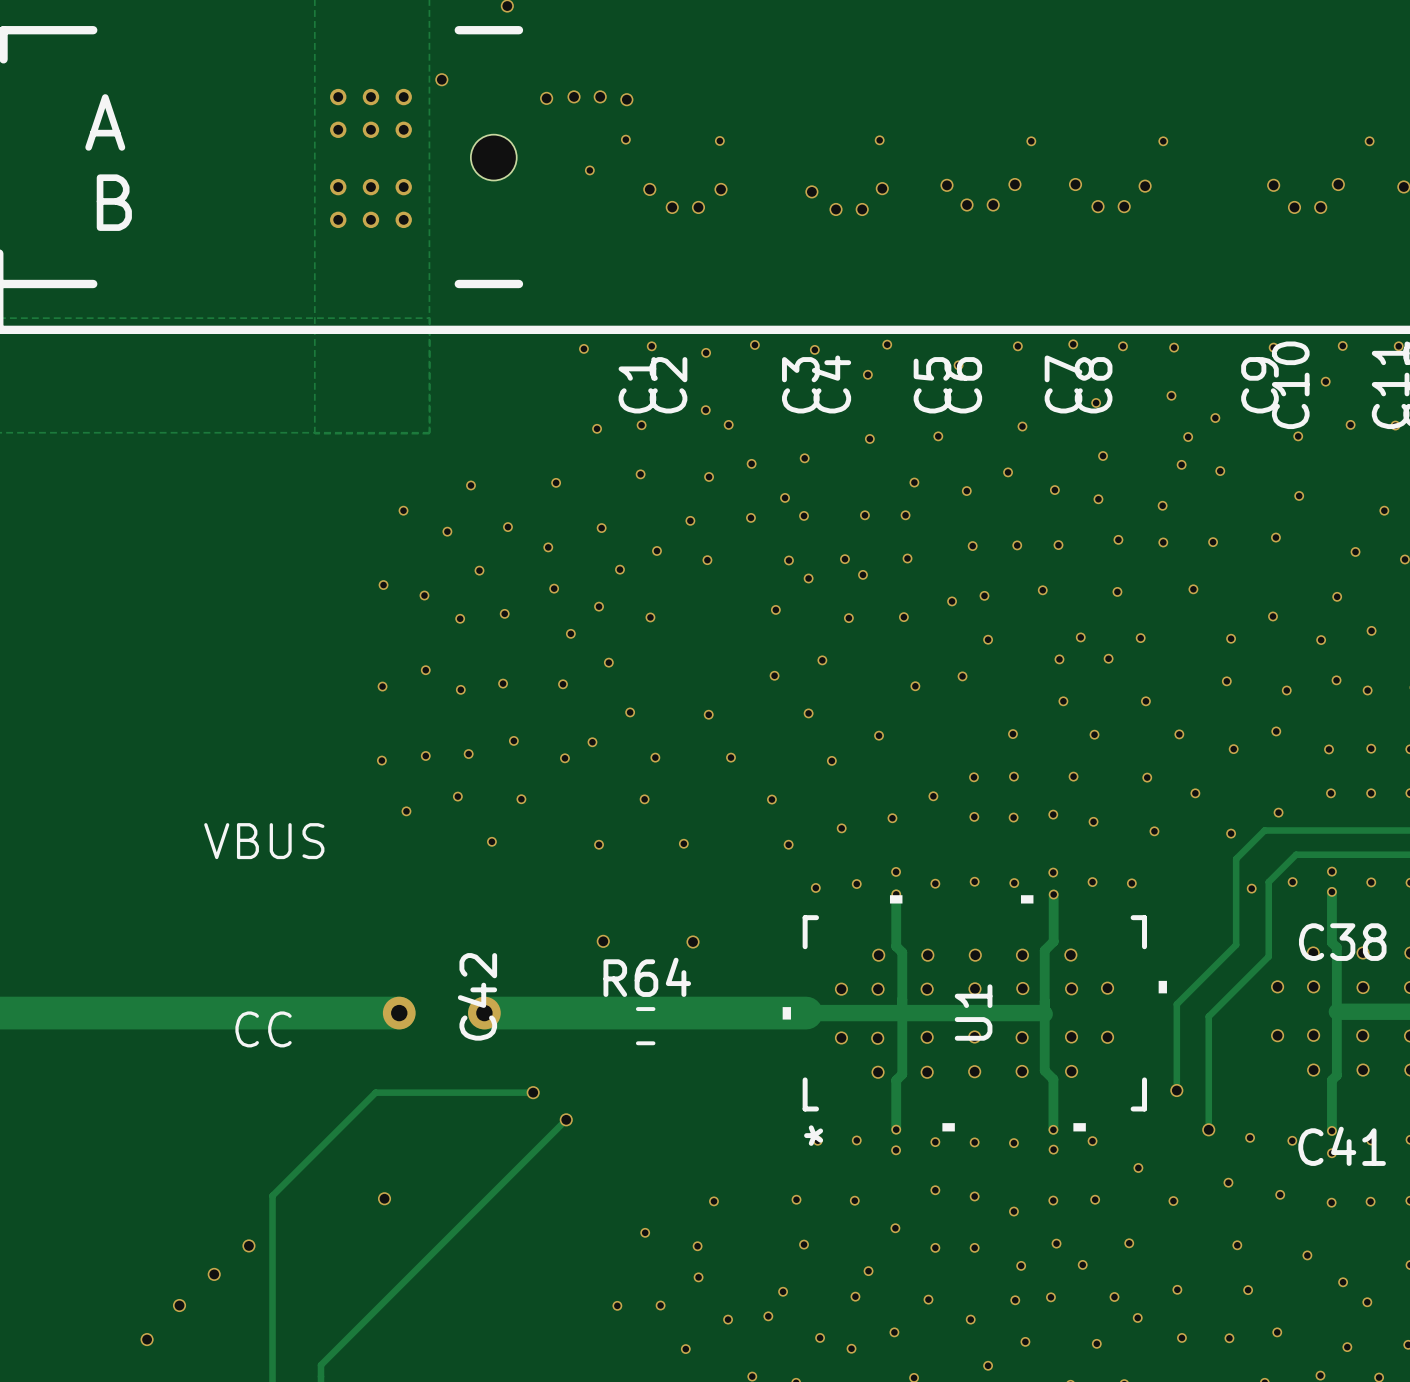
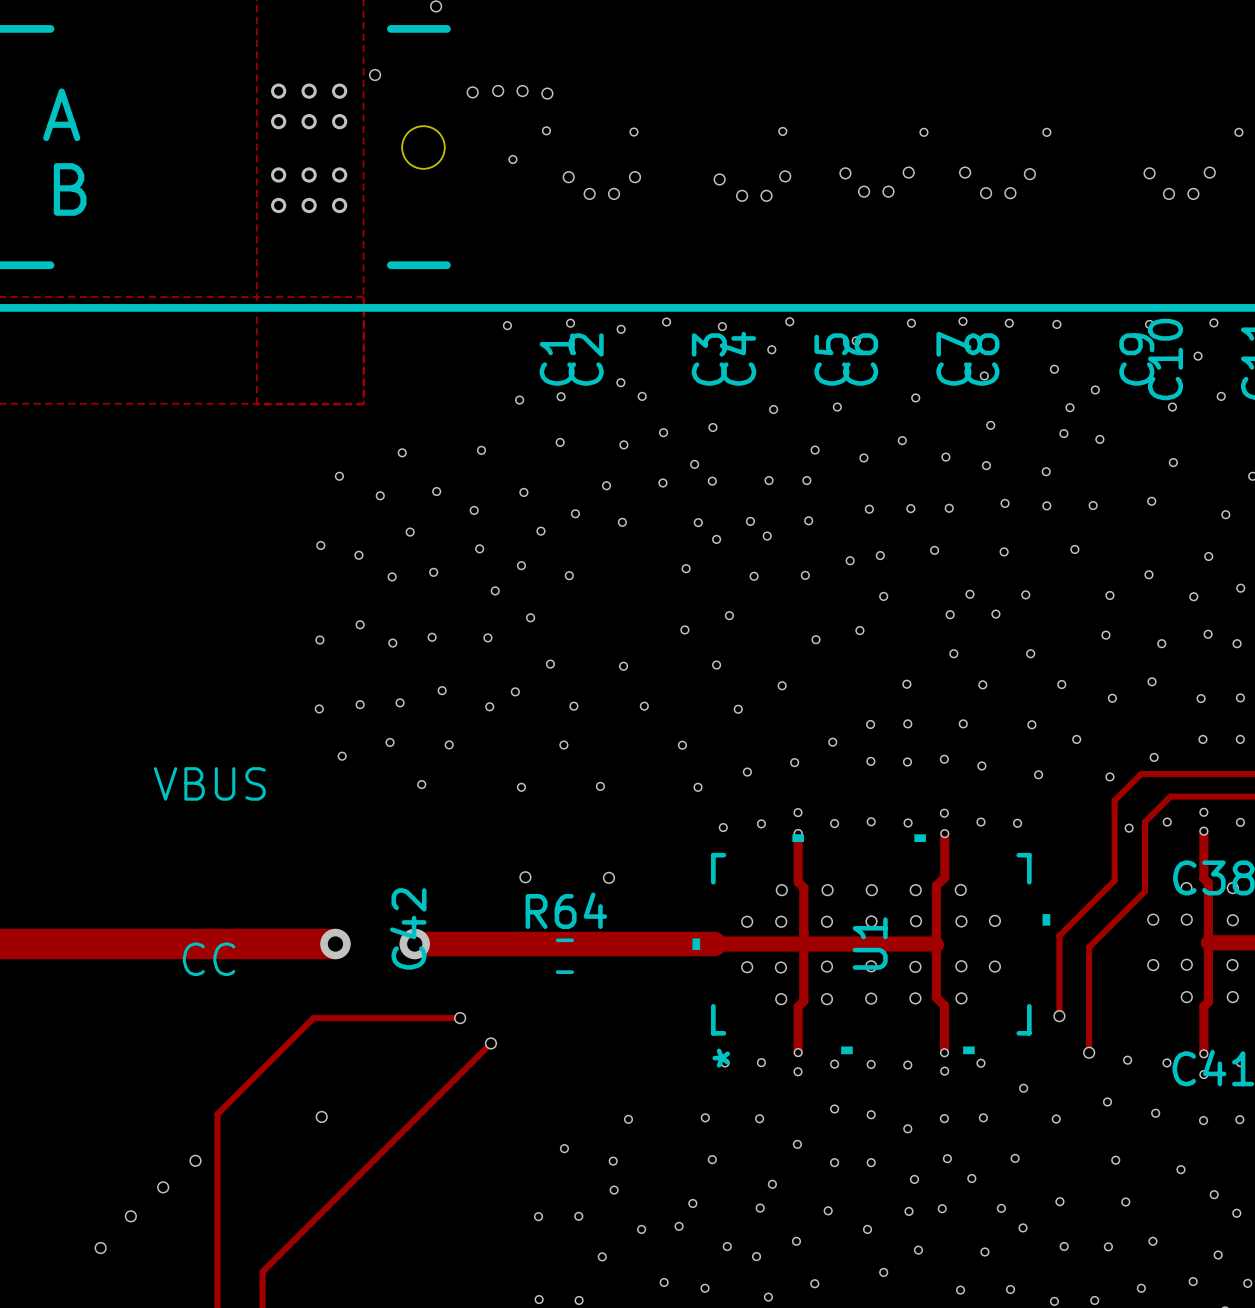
track width: thick (484, 1013) (806, 1013) -> thin (414, 944) (714, 944)

